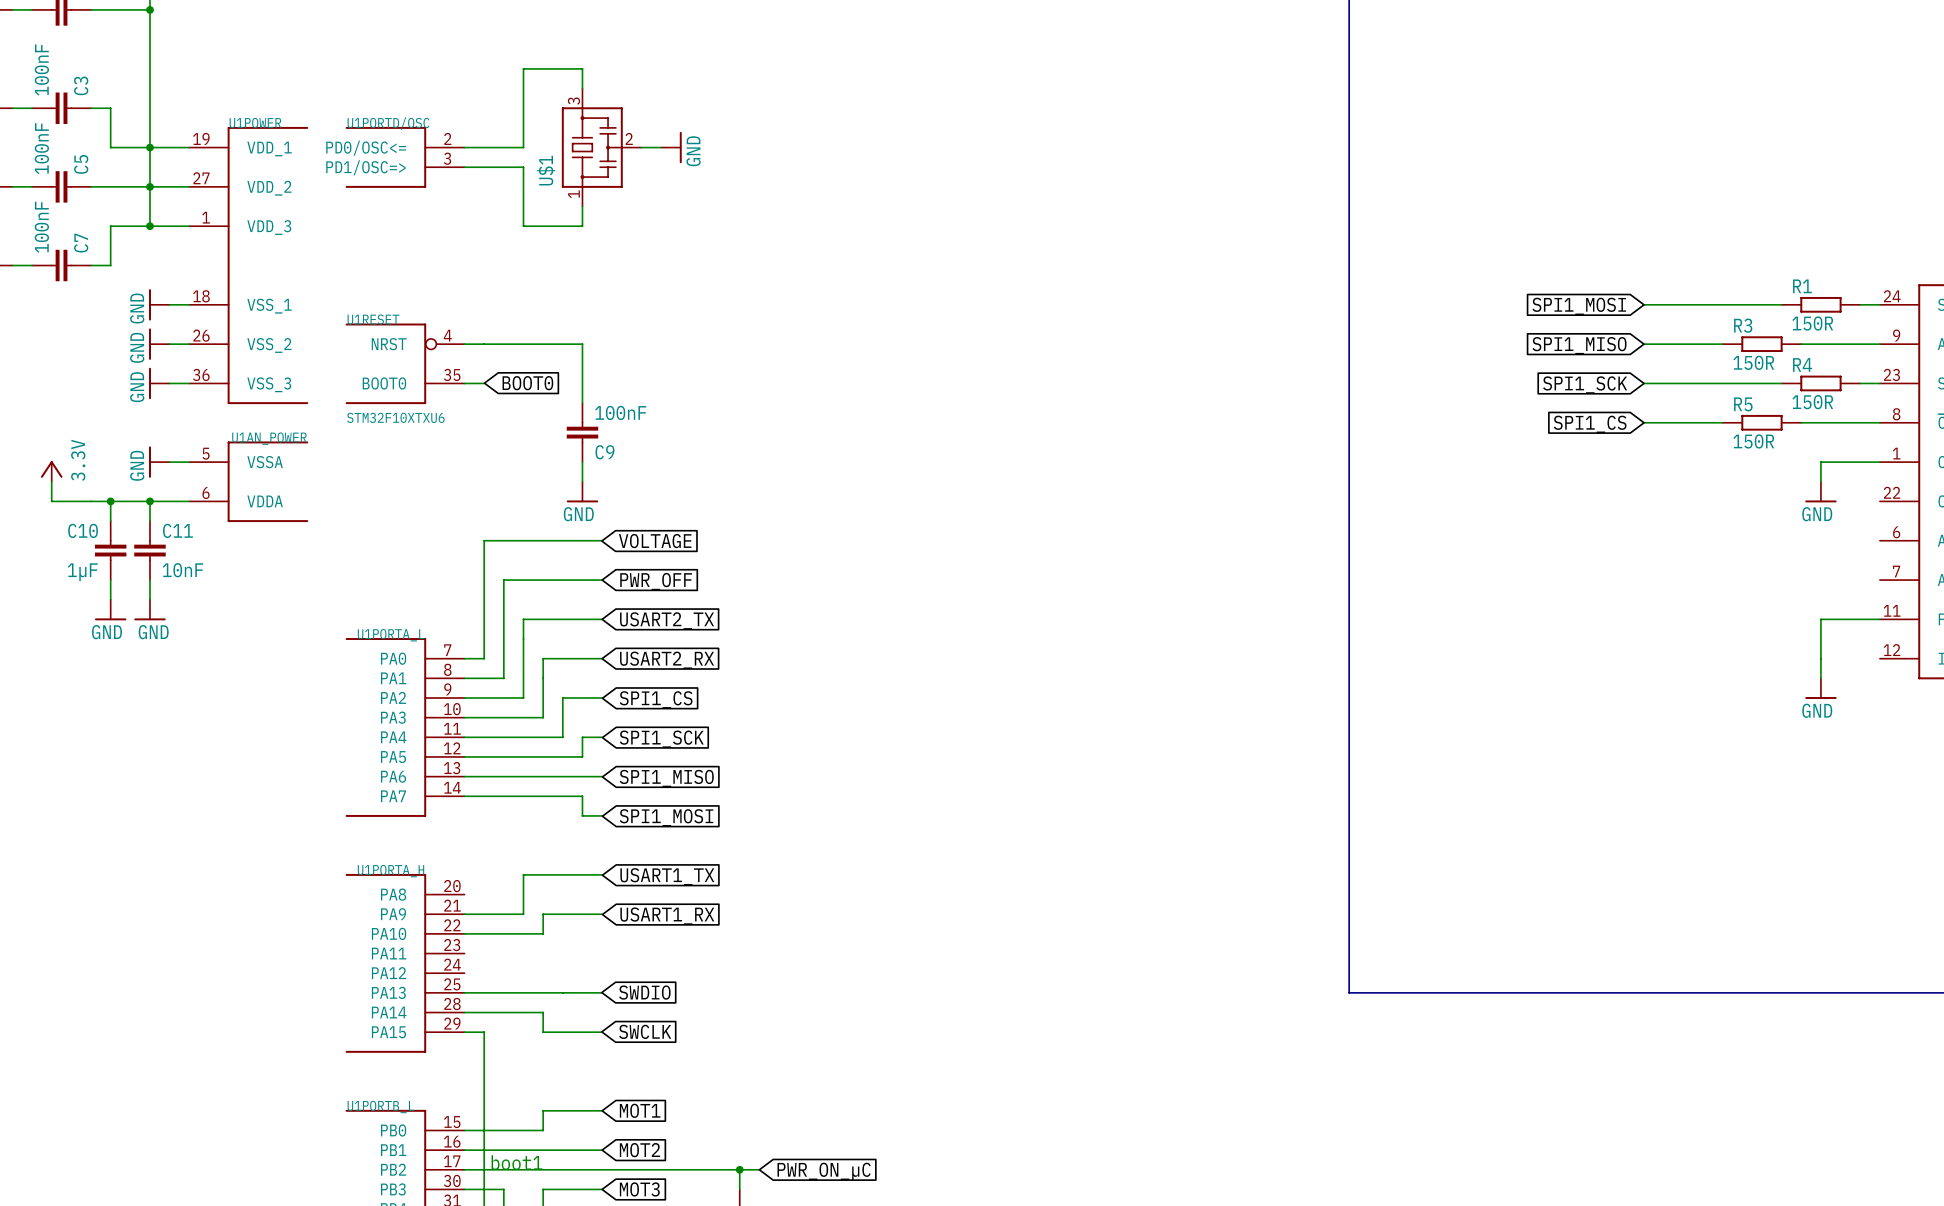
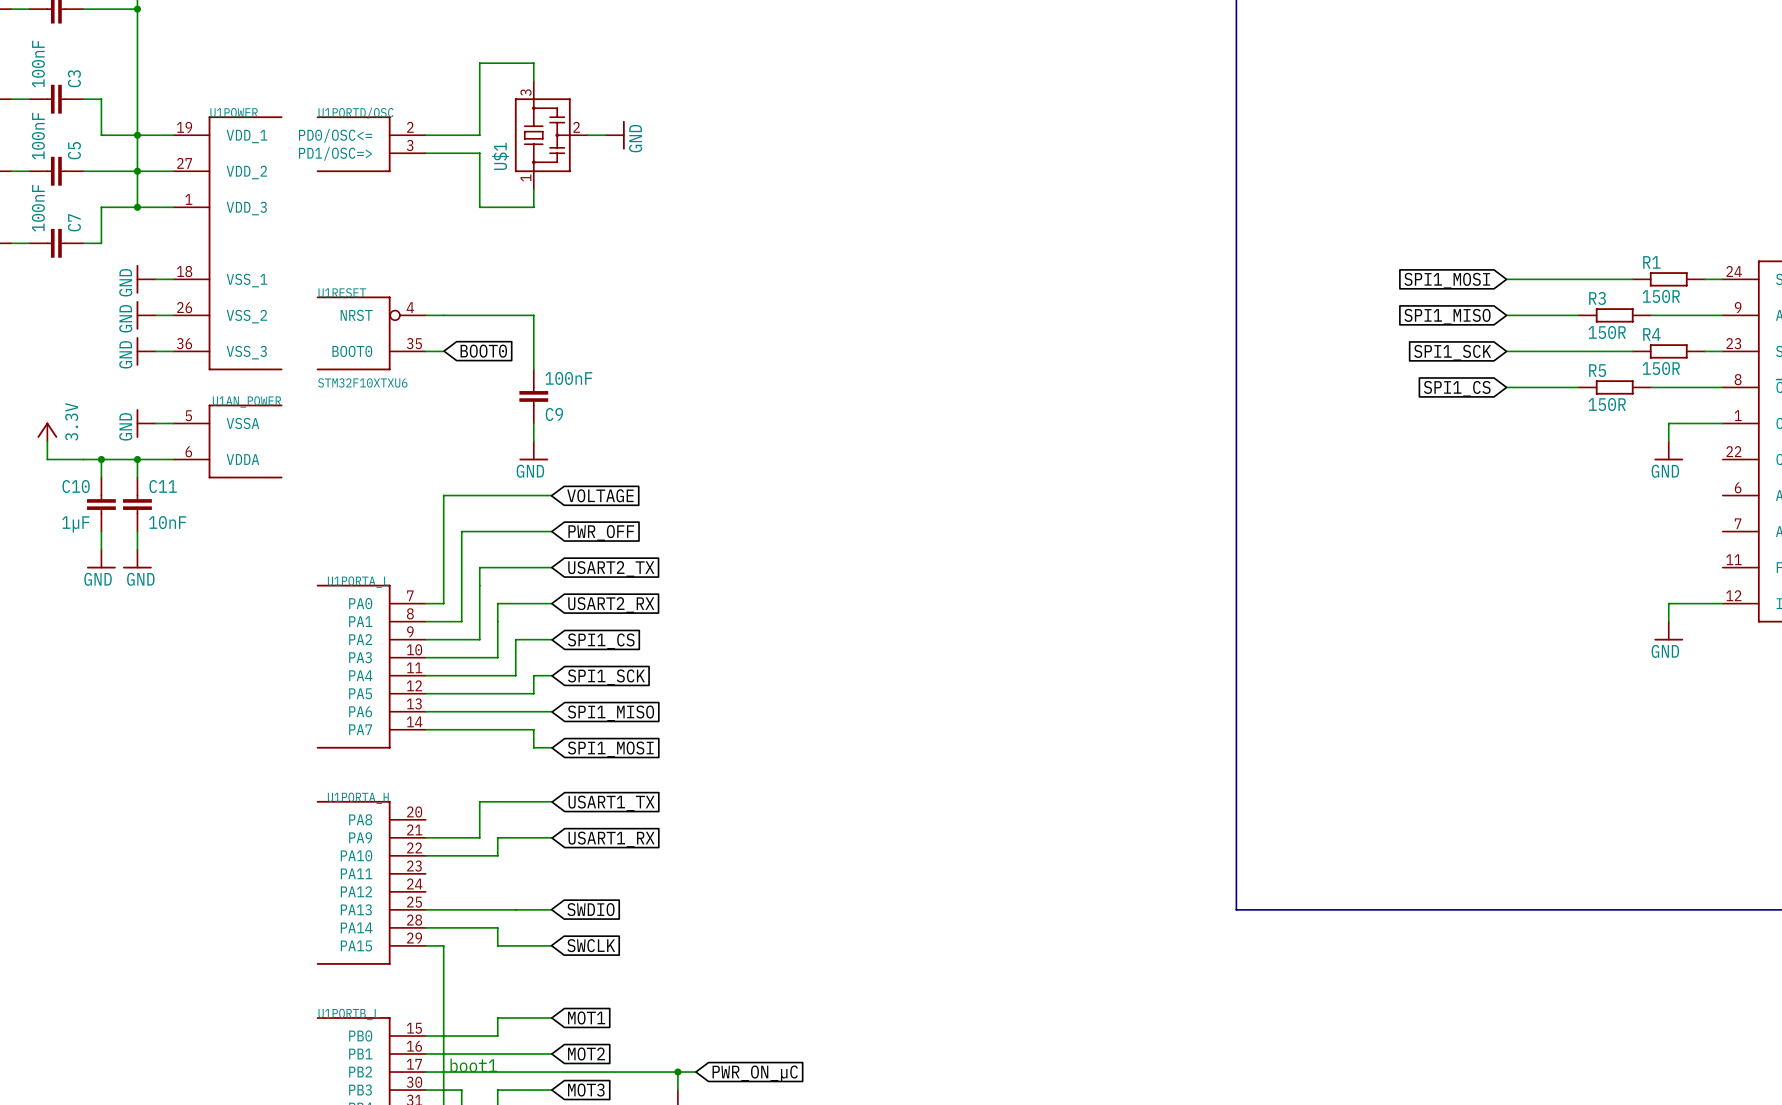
wire: (1879, 619) (1820, 619) (1820, 658) -> (1722, 603) (1668, 603)

